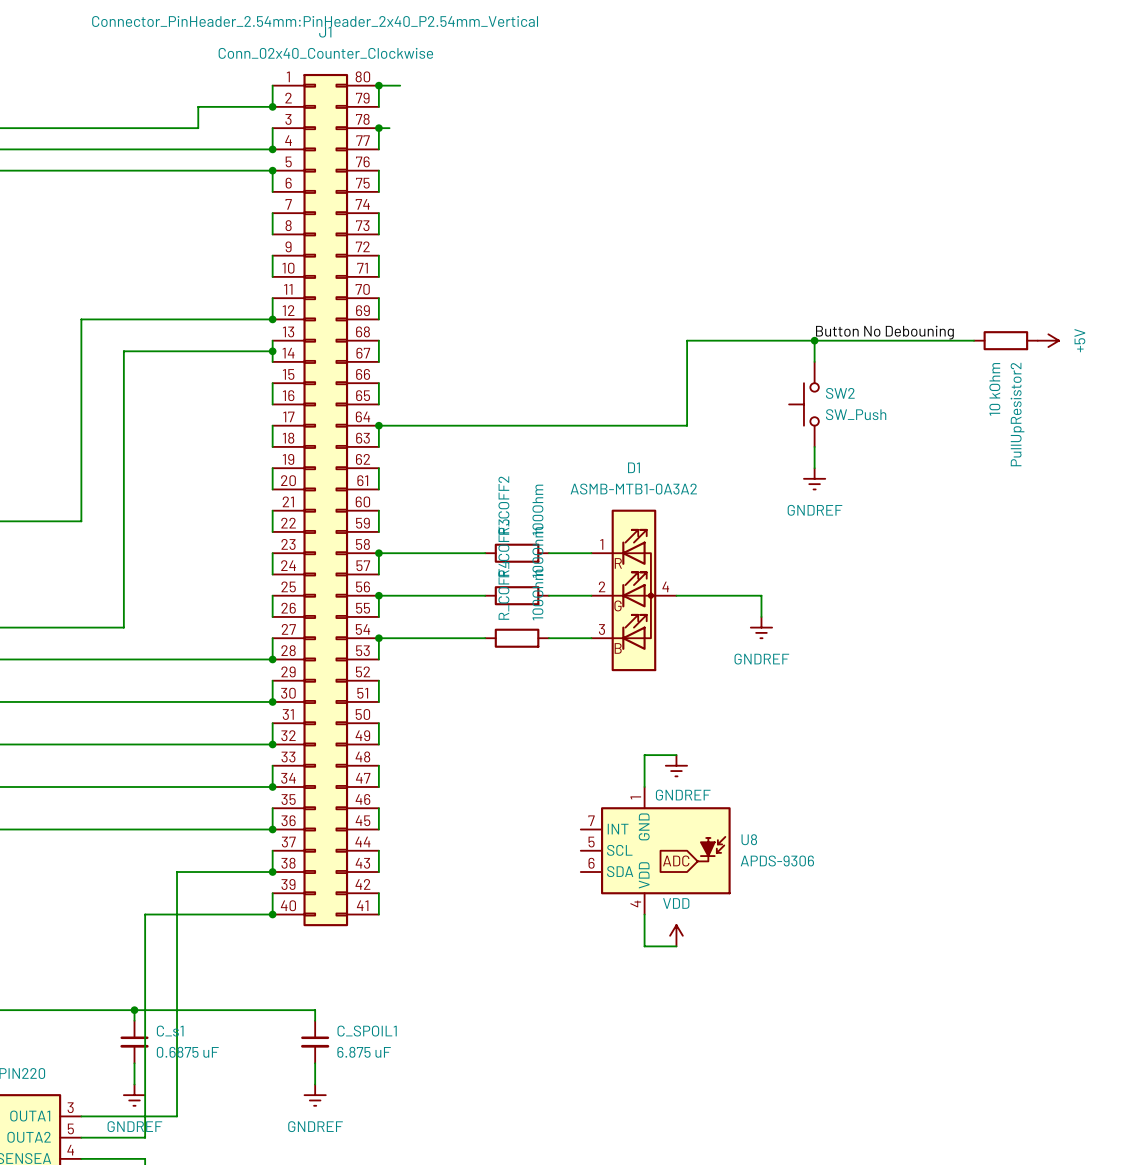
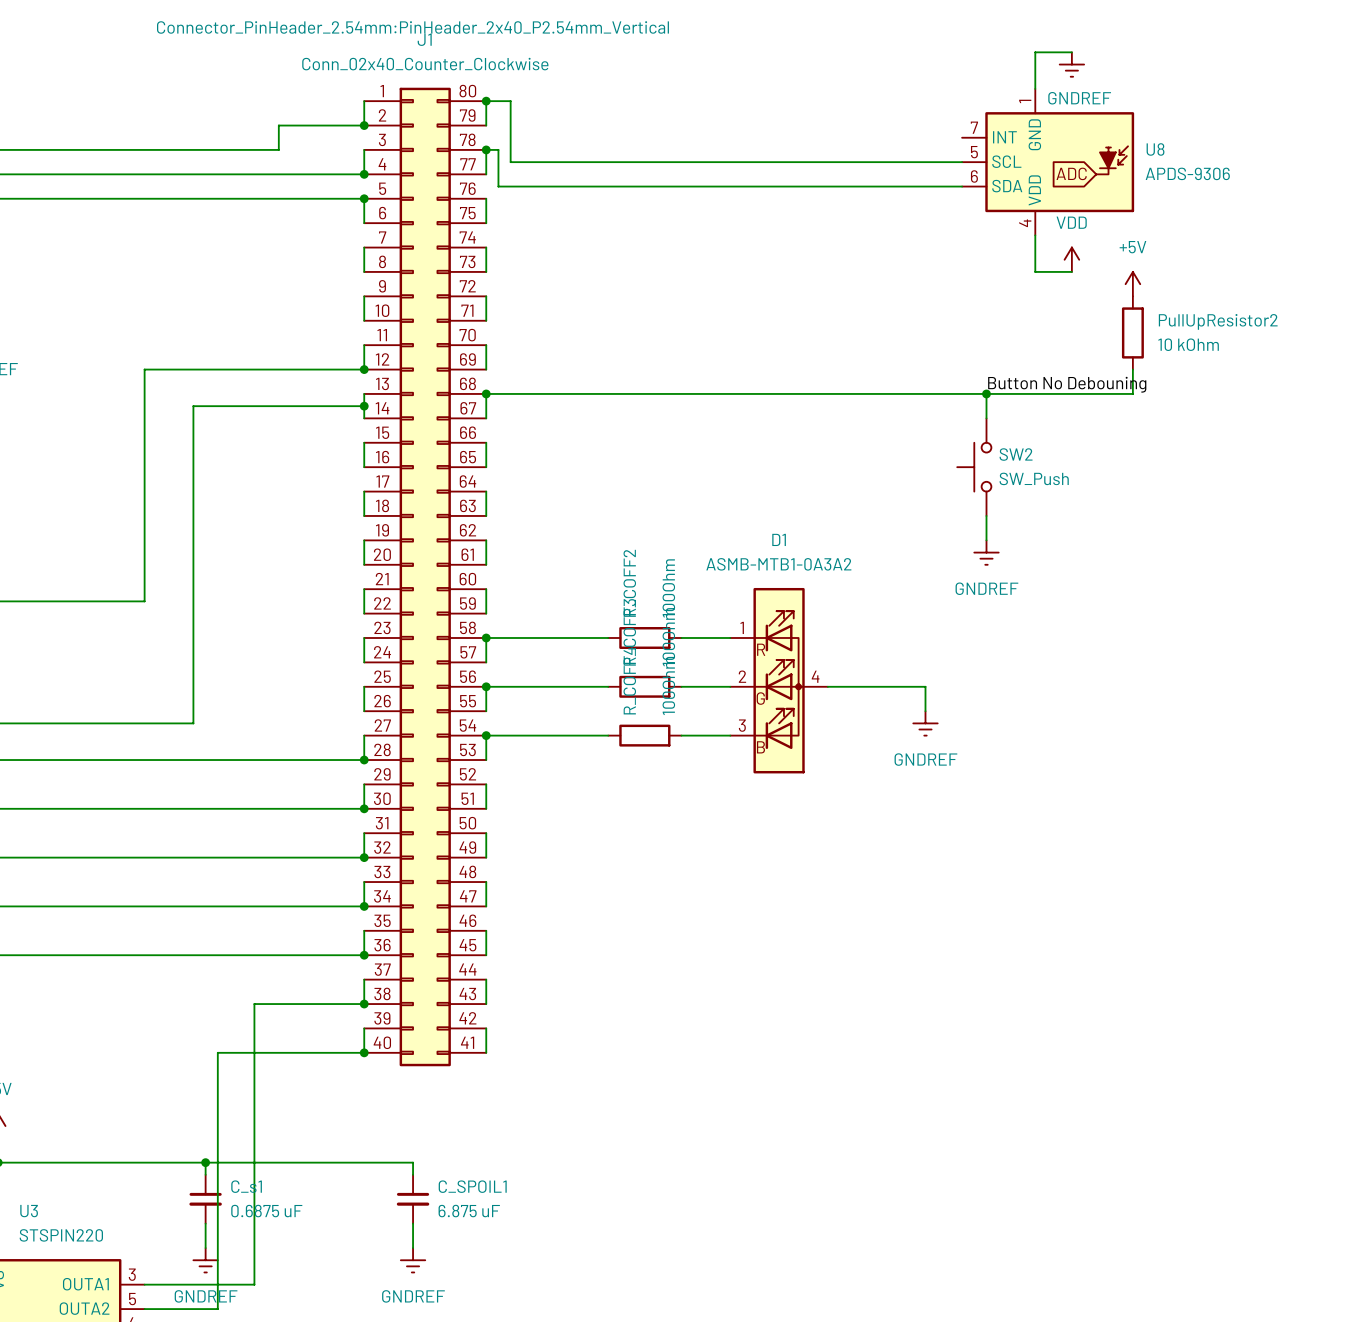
wire: none -> (1071, 52) (1035, 52) (1035, 88)
power symbol: none -> GNDREF (1071, 64)
wire: none -> (510, 101) (510, 162) (962, 162)
wire: none -> (498, 149) (498, 186) (962, 186)
wire: none -> (1035, 235) (1035, 271) (1071, 271)
power symbol: none -> VDD (1071, 259)
junction: none -> (486, 393)
wire: (687, 340) (687, 425) (378, 425) -> (840, 393) (486, 393)
wire: (942, 340) (974, 340) -> (1132, 393) (1132, 369)
PullUpResistor2 rotation: 0° (1005, 340) -> 90° clockwise (1132, 332)
PullUpResistor2 position: (1005, 340) -> (1132, 332)
power symbol rotation: 0° (1048, 340) -> 90° counterclockwise (1132, 284)
power symbol position: +5V (1048, 340) -> +5V (1132, 284)
PullUpResistor2 value position: 10 kOhm (994, 389) -> 10 kOhm (1188, 344)
PullUpResistor2 name position: PullUpResistor2 (1017, 414) -> PullUpResistor2 (1218, 321)
junction: (378, 425) -> none
wire: (676, 755) (644, 755) (644, 786) -> none
power symbol: GNDREF (676, 765) -> none
U8 position: (655, 850) -> (1048, 162)
wire: (644, 914) (644, 946) (676, 946) -> none
power symbol: VDD (676, 935) -> none

